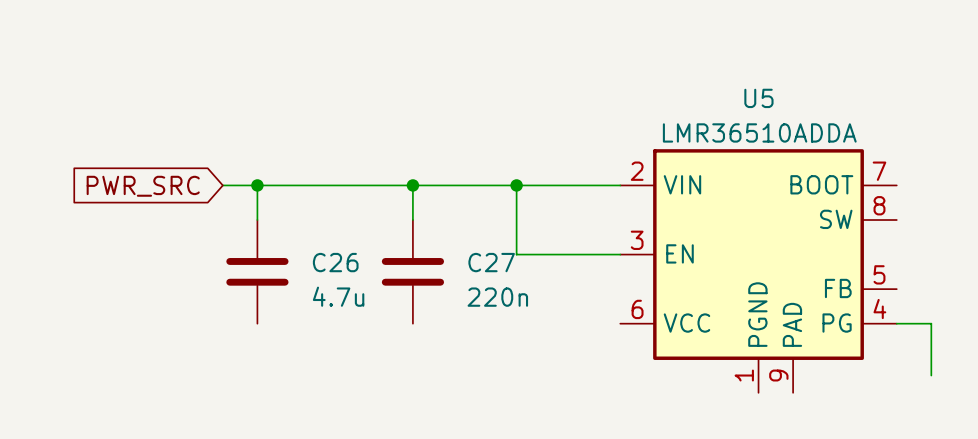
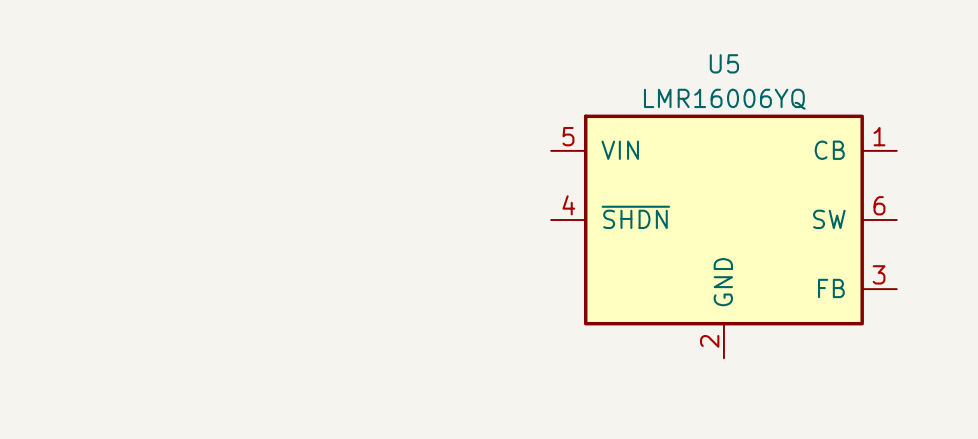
U5 value: LMR36510ADDA (759, 132) -> LMR16006YQ (724, 99)
U5 symbol: [620, 149, 897, 393] -> [551, 114, 897, 359]
wire: (222, 185) (620, 185) -> none
wire: (257, 185) (257, 220) -> none
junction: (257, 185) -> none
wire: (412, 185) (412, 220) -> none
junction: (412, 185) -> none
wire: (516, 185) (516, 254) (620, 254) -> none
junction: (516, 185) -> none
global label: PWR_SRC (143, 186) -> none
C26: 4.7u (257, 271) -> none
C27: 220n (412, 271) -> none
wire: (896, 323) (931, 323) (931, 375) -> none

